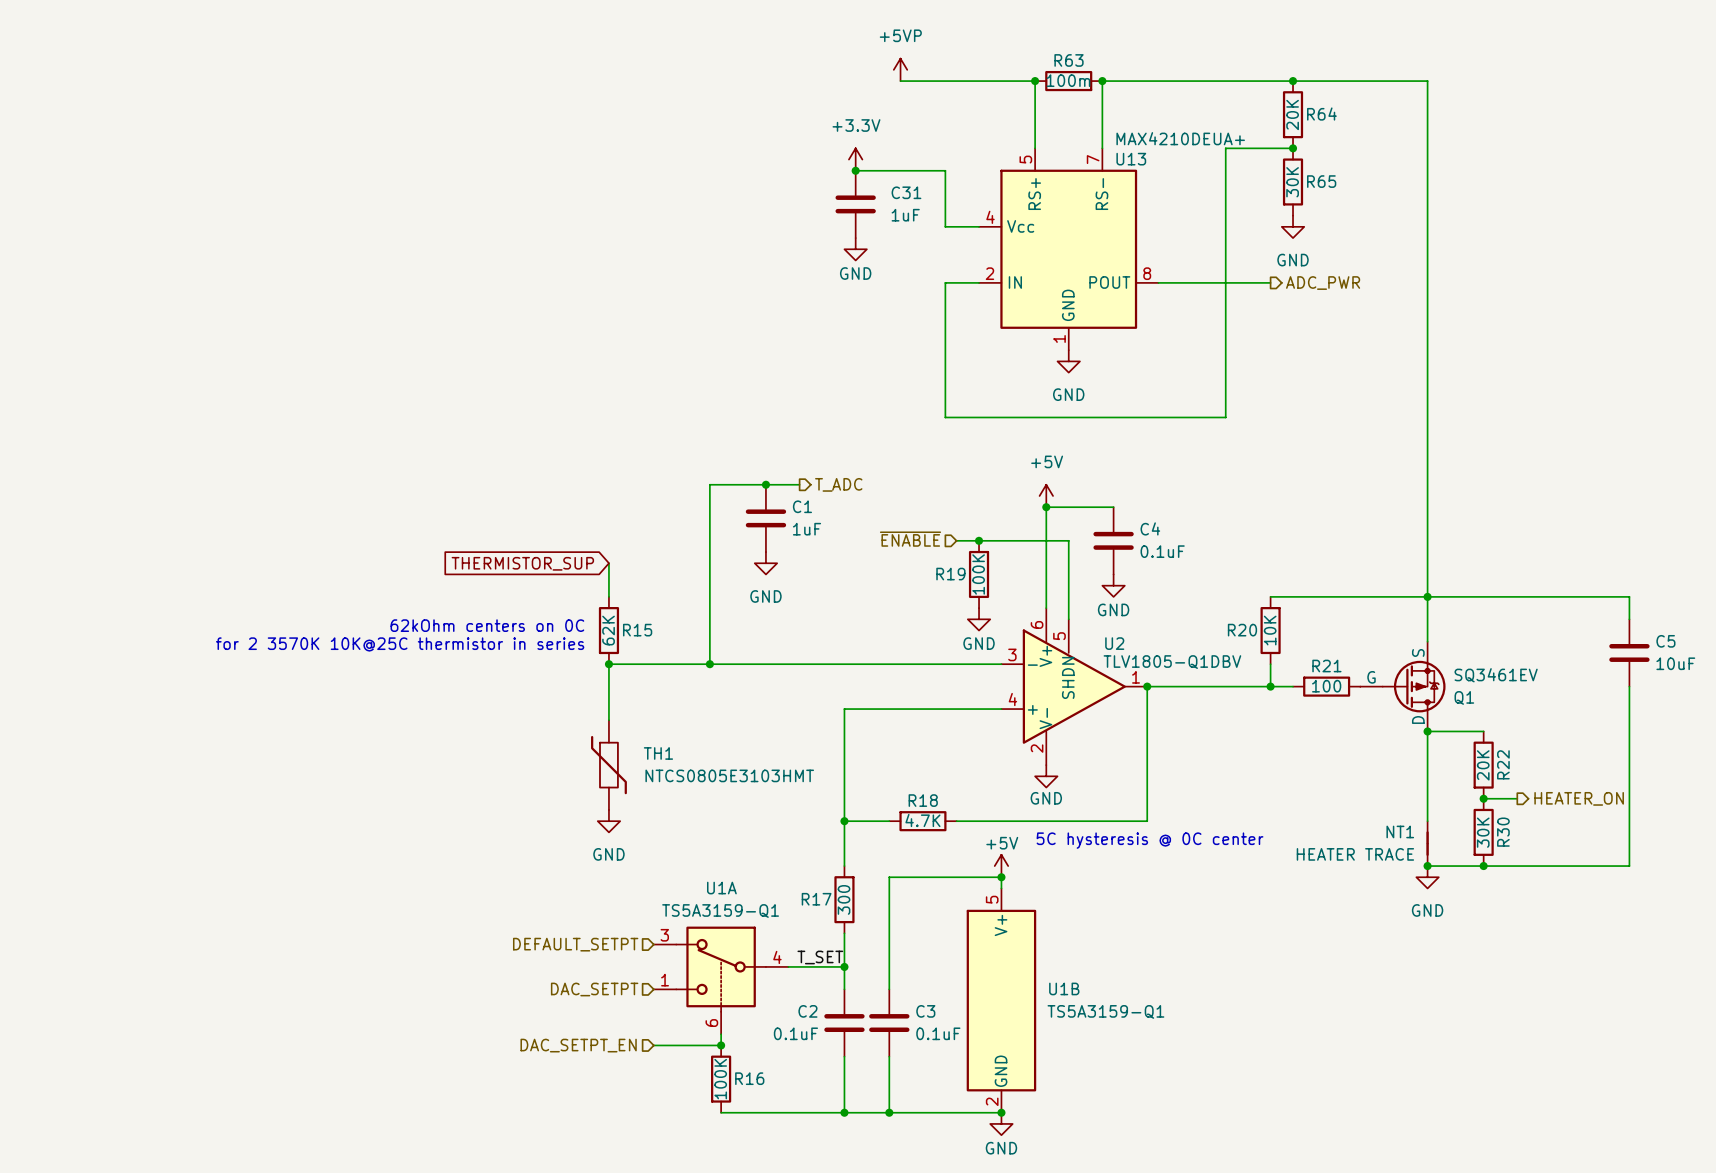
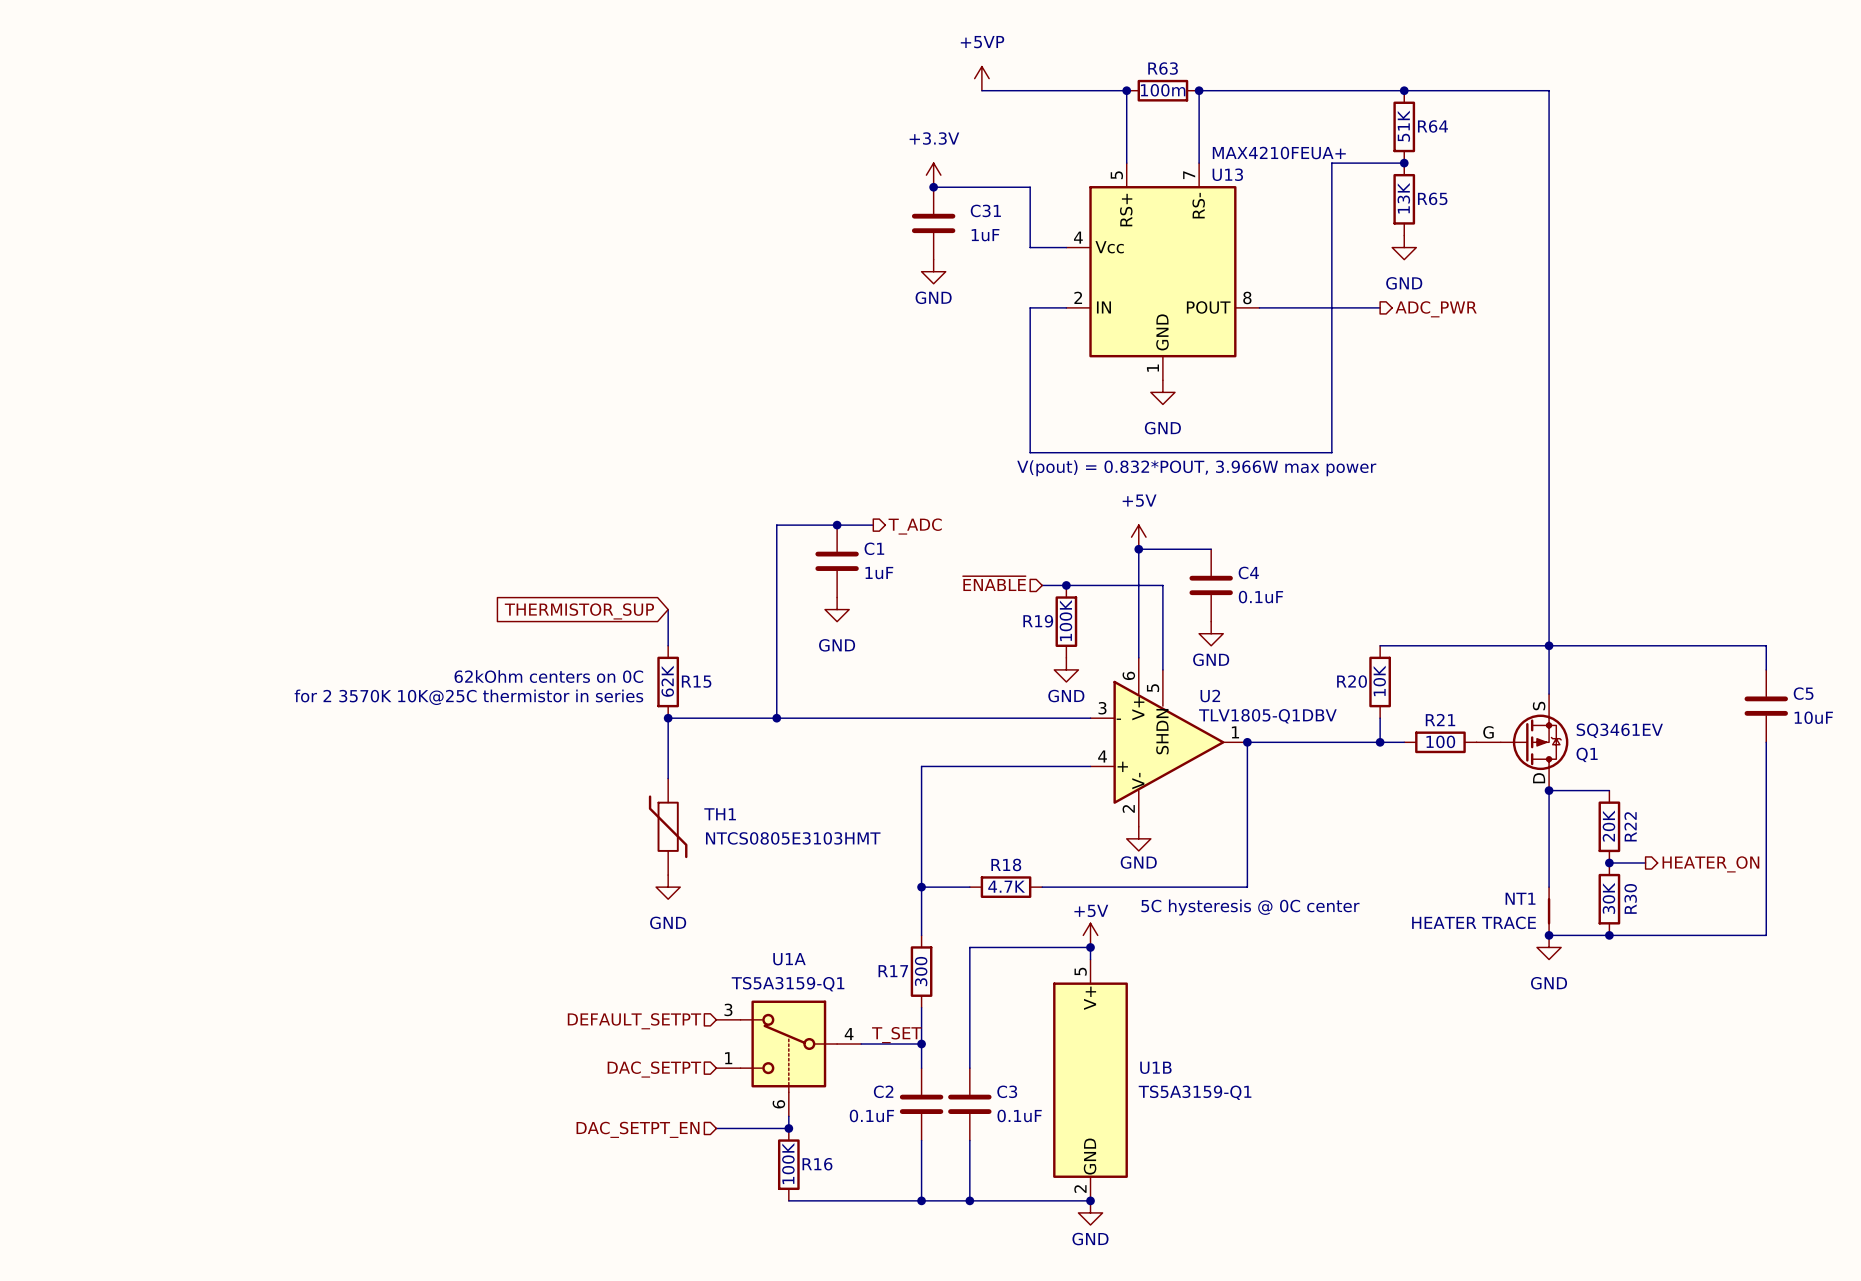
R64 value: 20K (1292, 114) -> 51K (1403, 126)
U13 value: MAX4210DEUA+ (1180, 138) -> MAX4210FEUA+ (1279, 153)
R65 value: 30K (1292, 182) -> 13K (1403, 198)
text: none -> V(pout) = 0.832*POUT, 3.966W max power (1196, 468)

